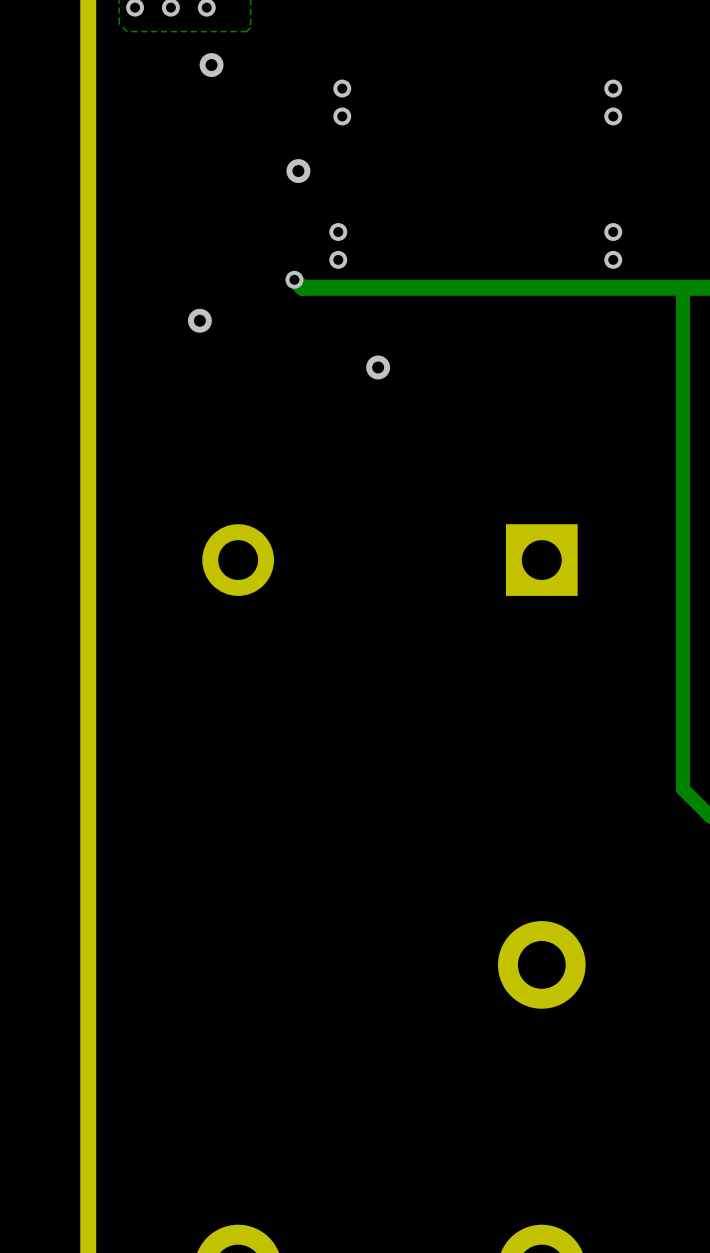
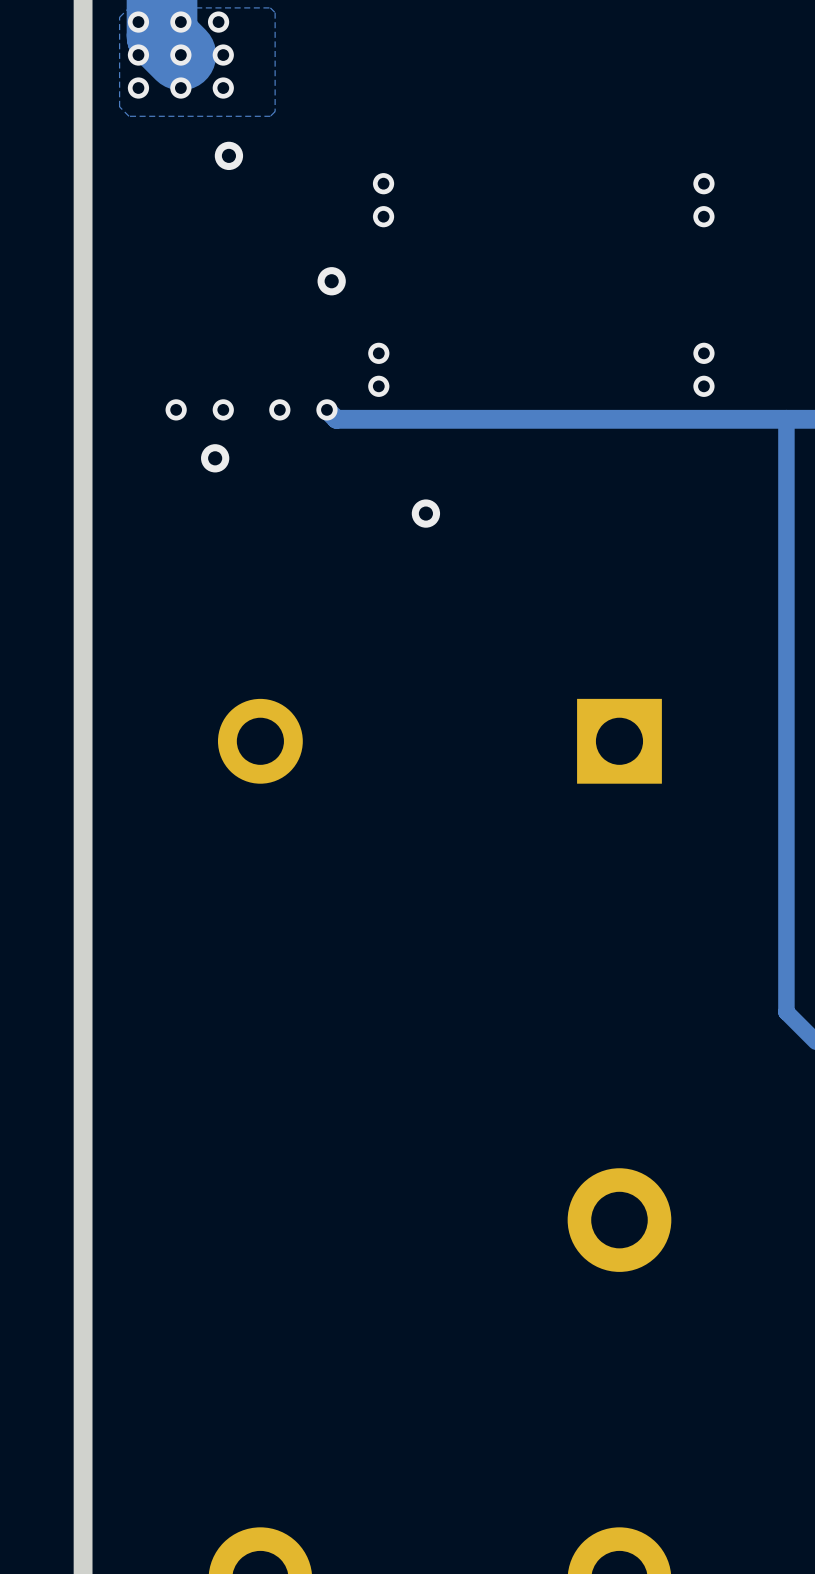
via: none -> (176, 409)
via: none -> (223, 409)
via: none -> (279, 409)

